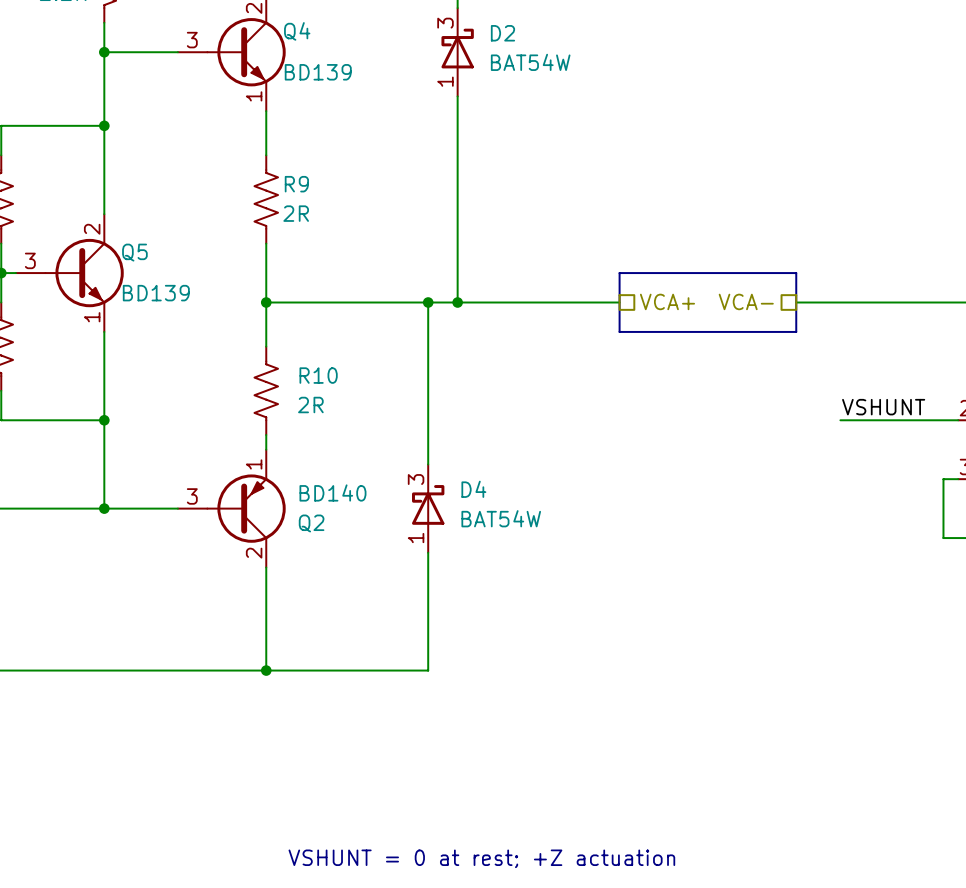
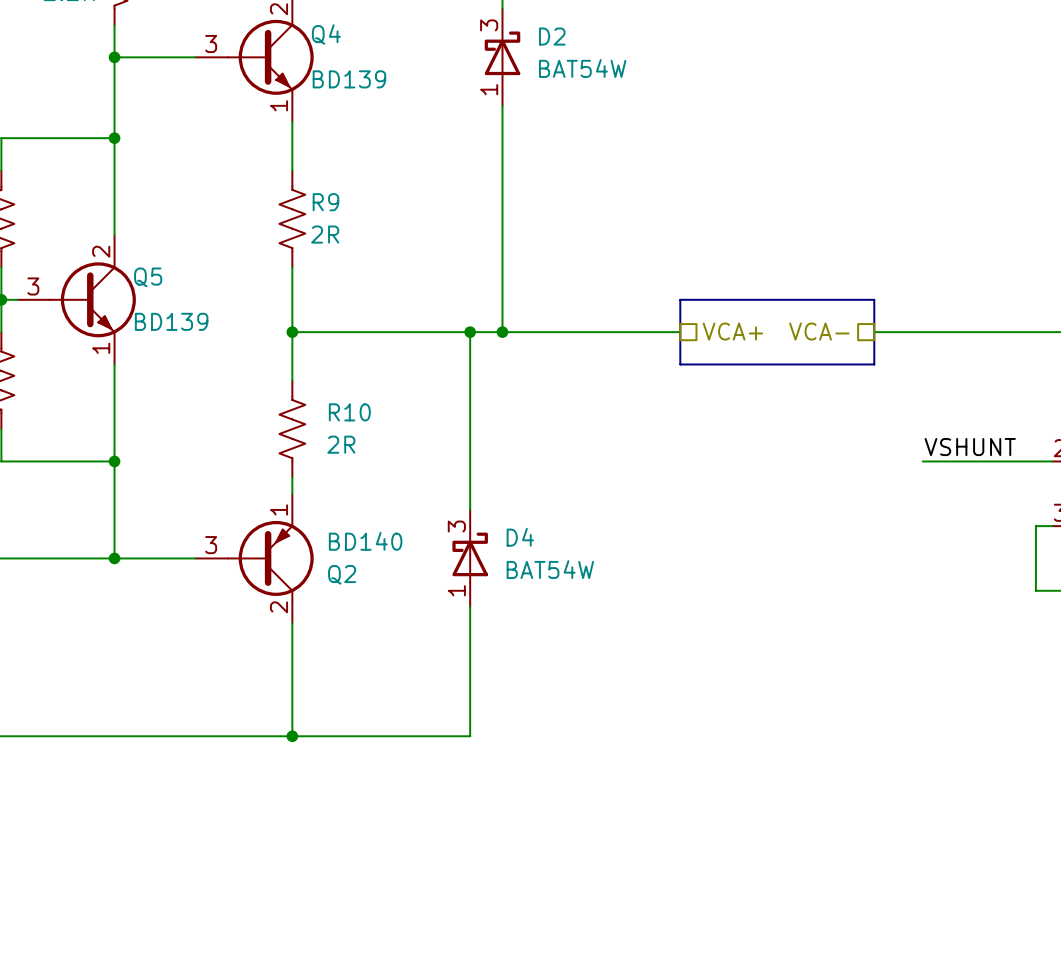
text: VSHUNT = 0 at rest; +Z actuation (481, 858) -> none

